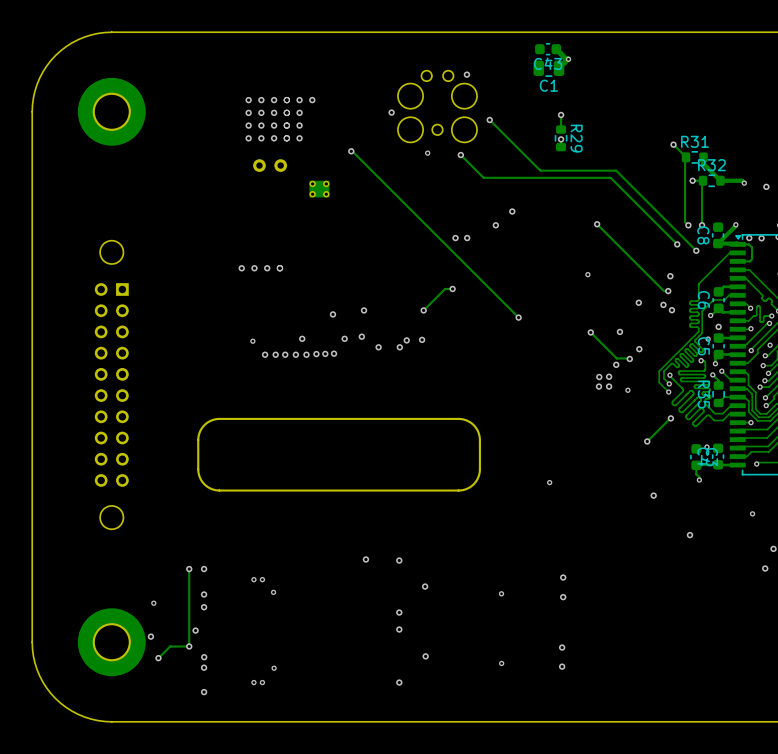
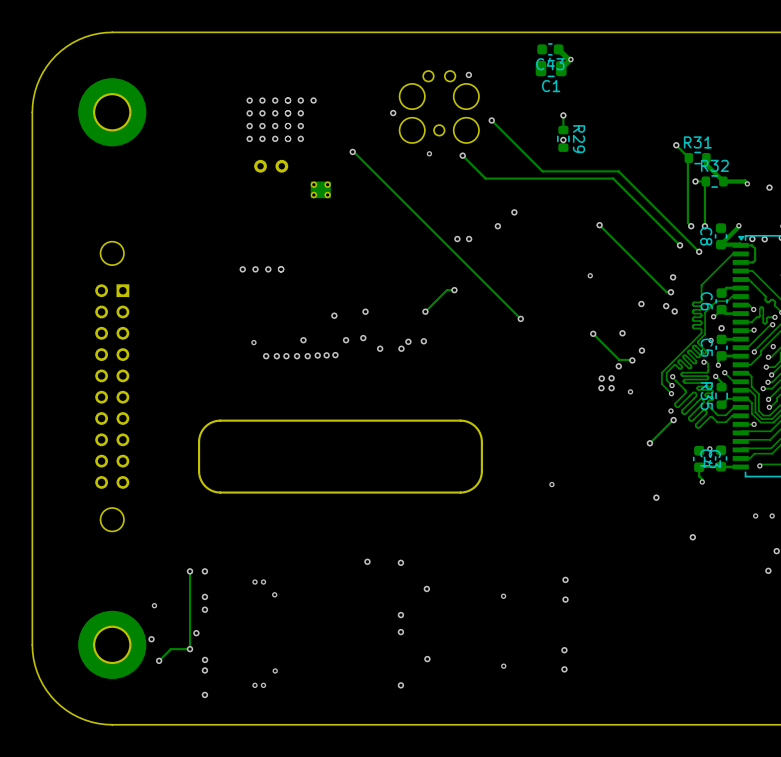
via: none -> (670, 411)
via: none -> (772, 515)

